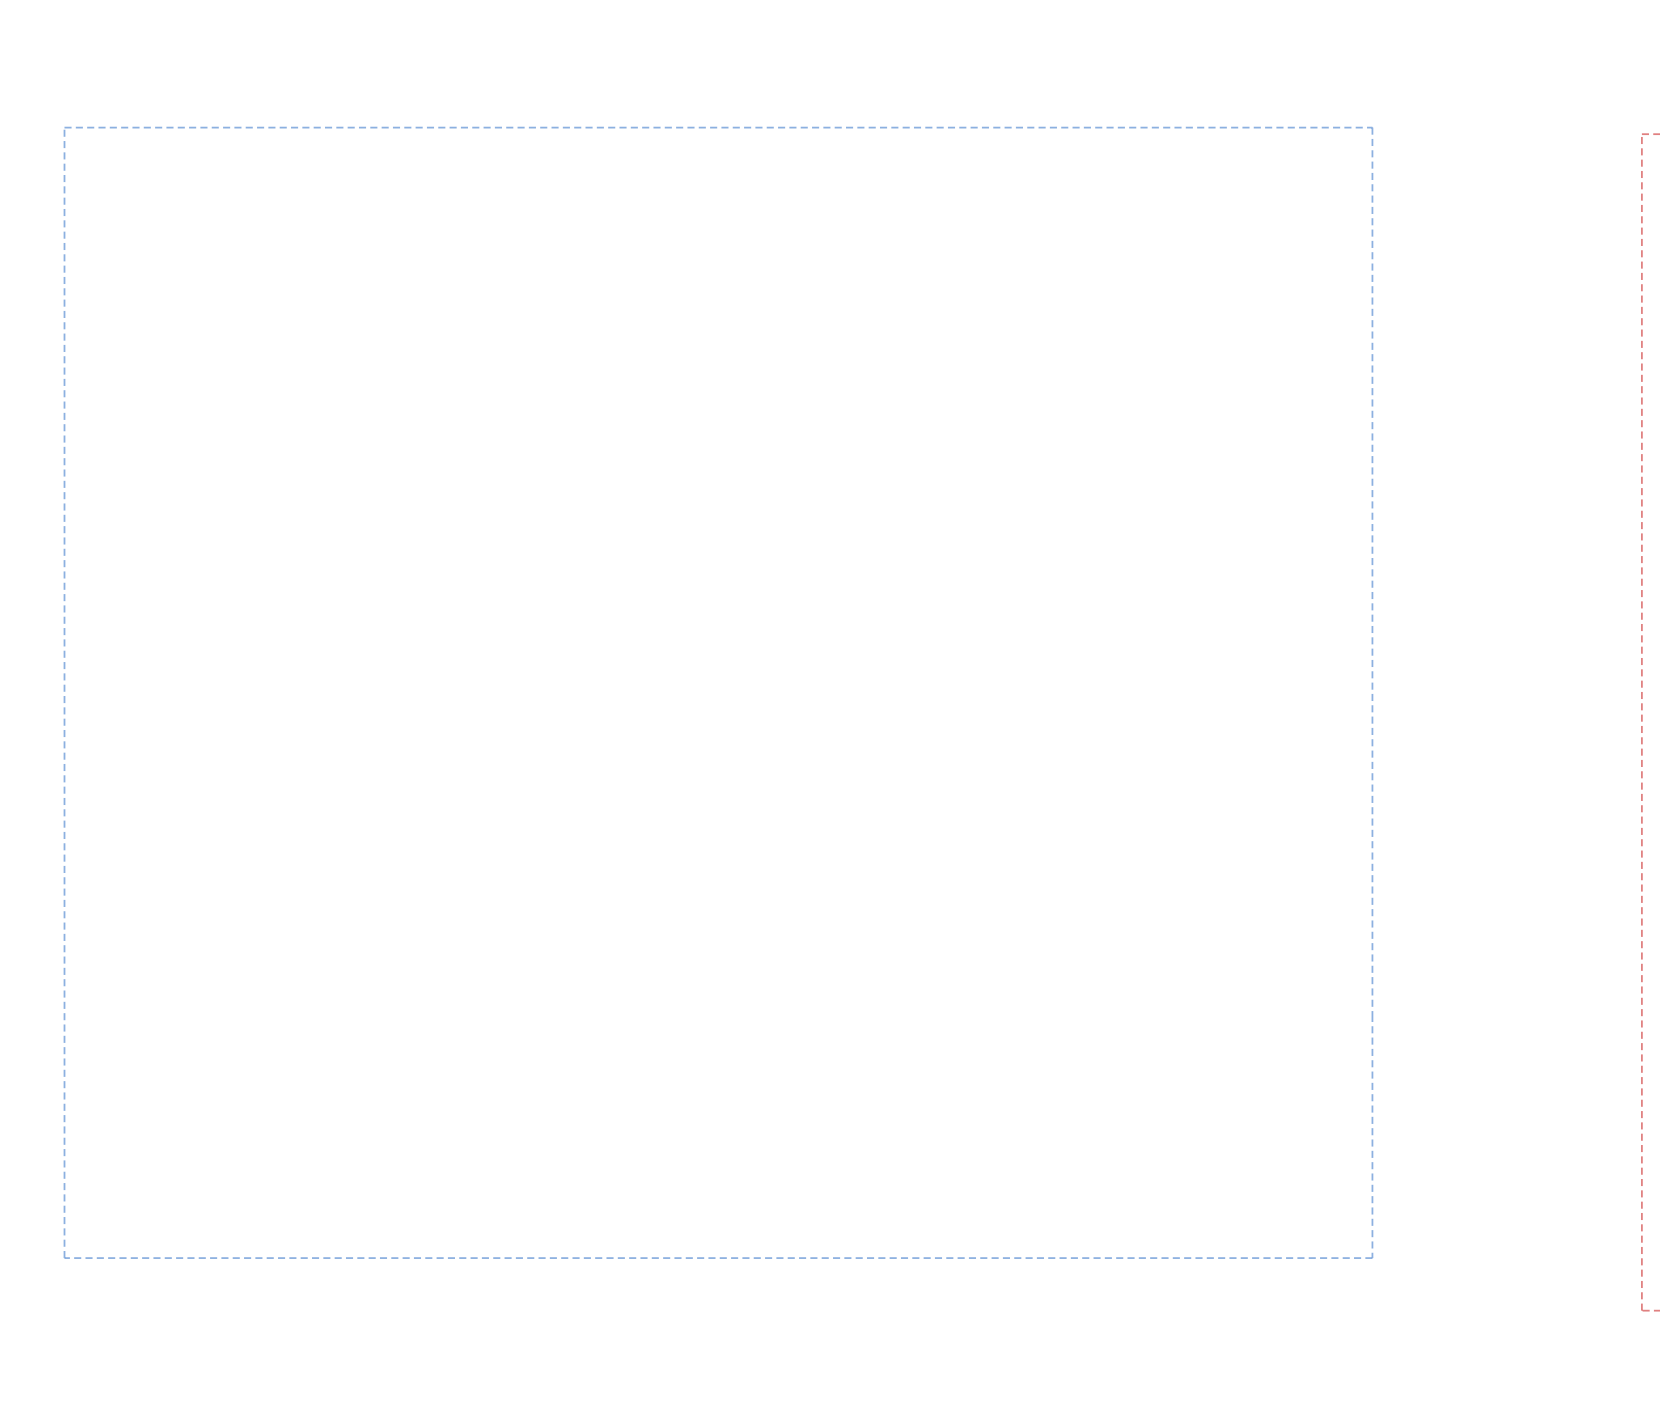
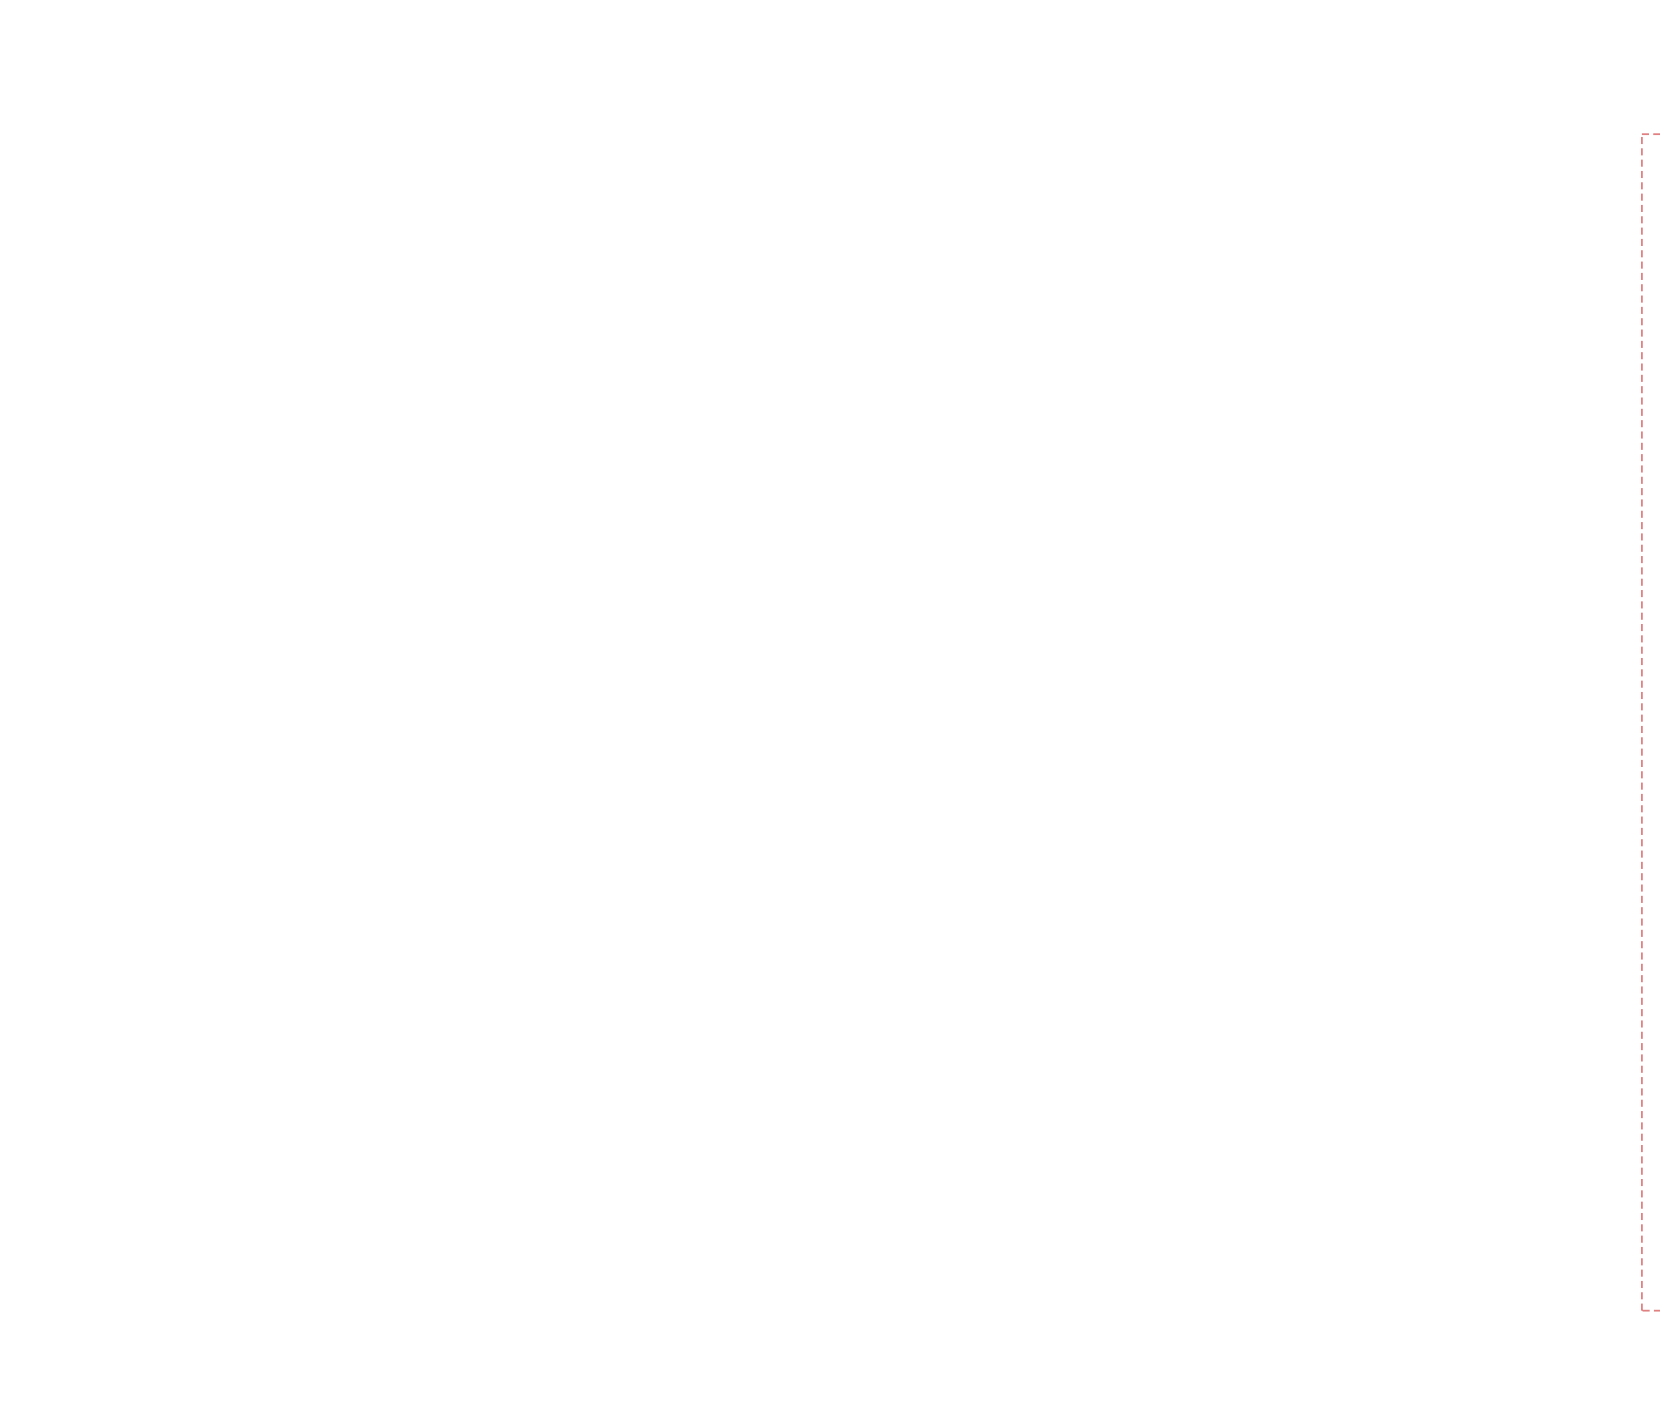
bottom zone outline: (64, 127) (64, 1258) (1372, 1258) (1372, 127) (64, 127) -> none

